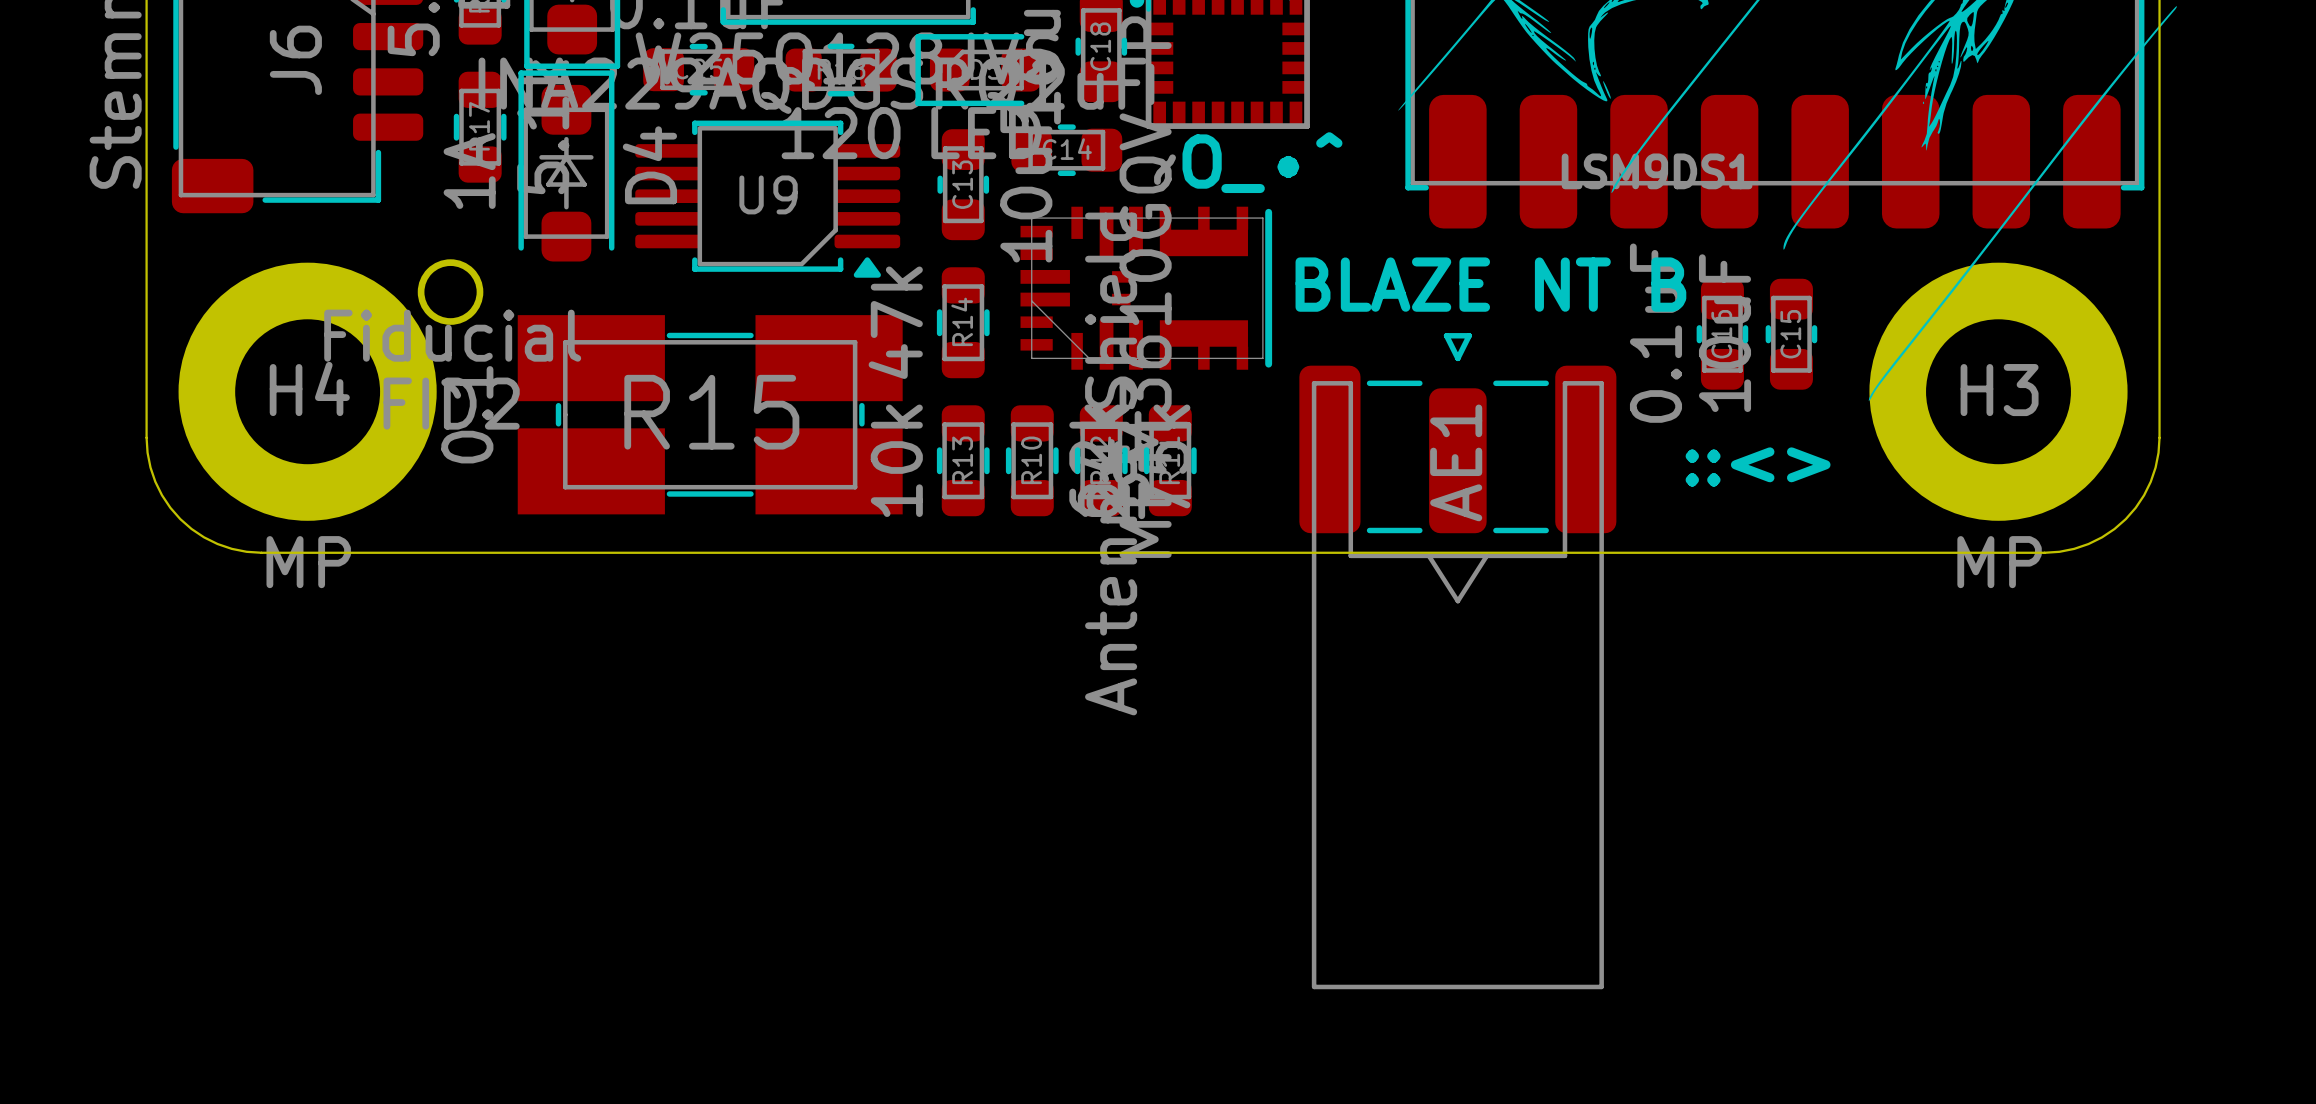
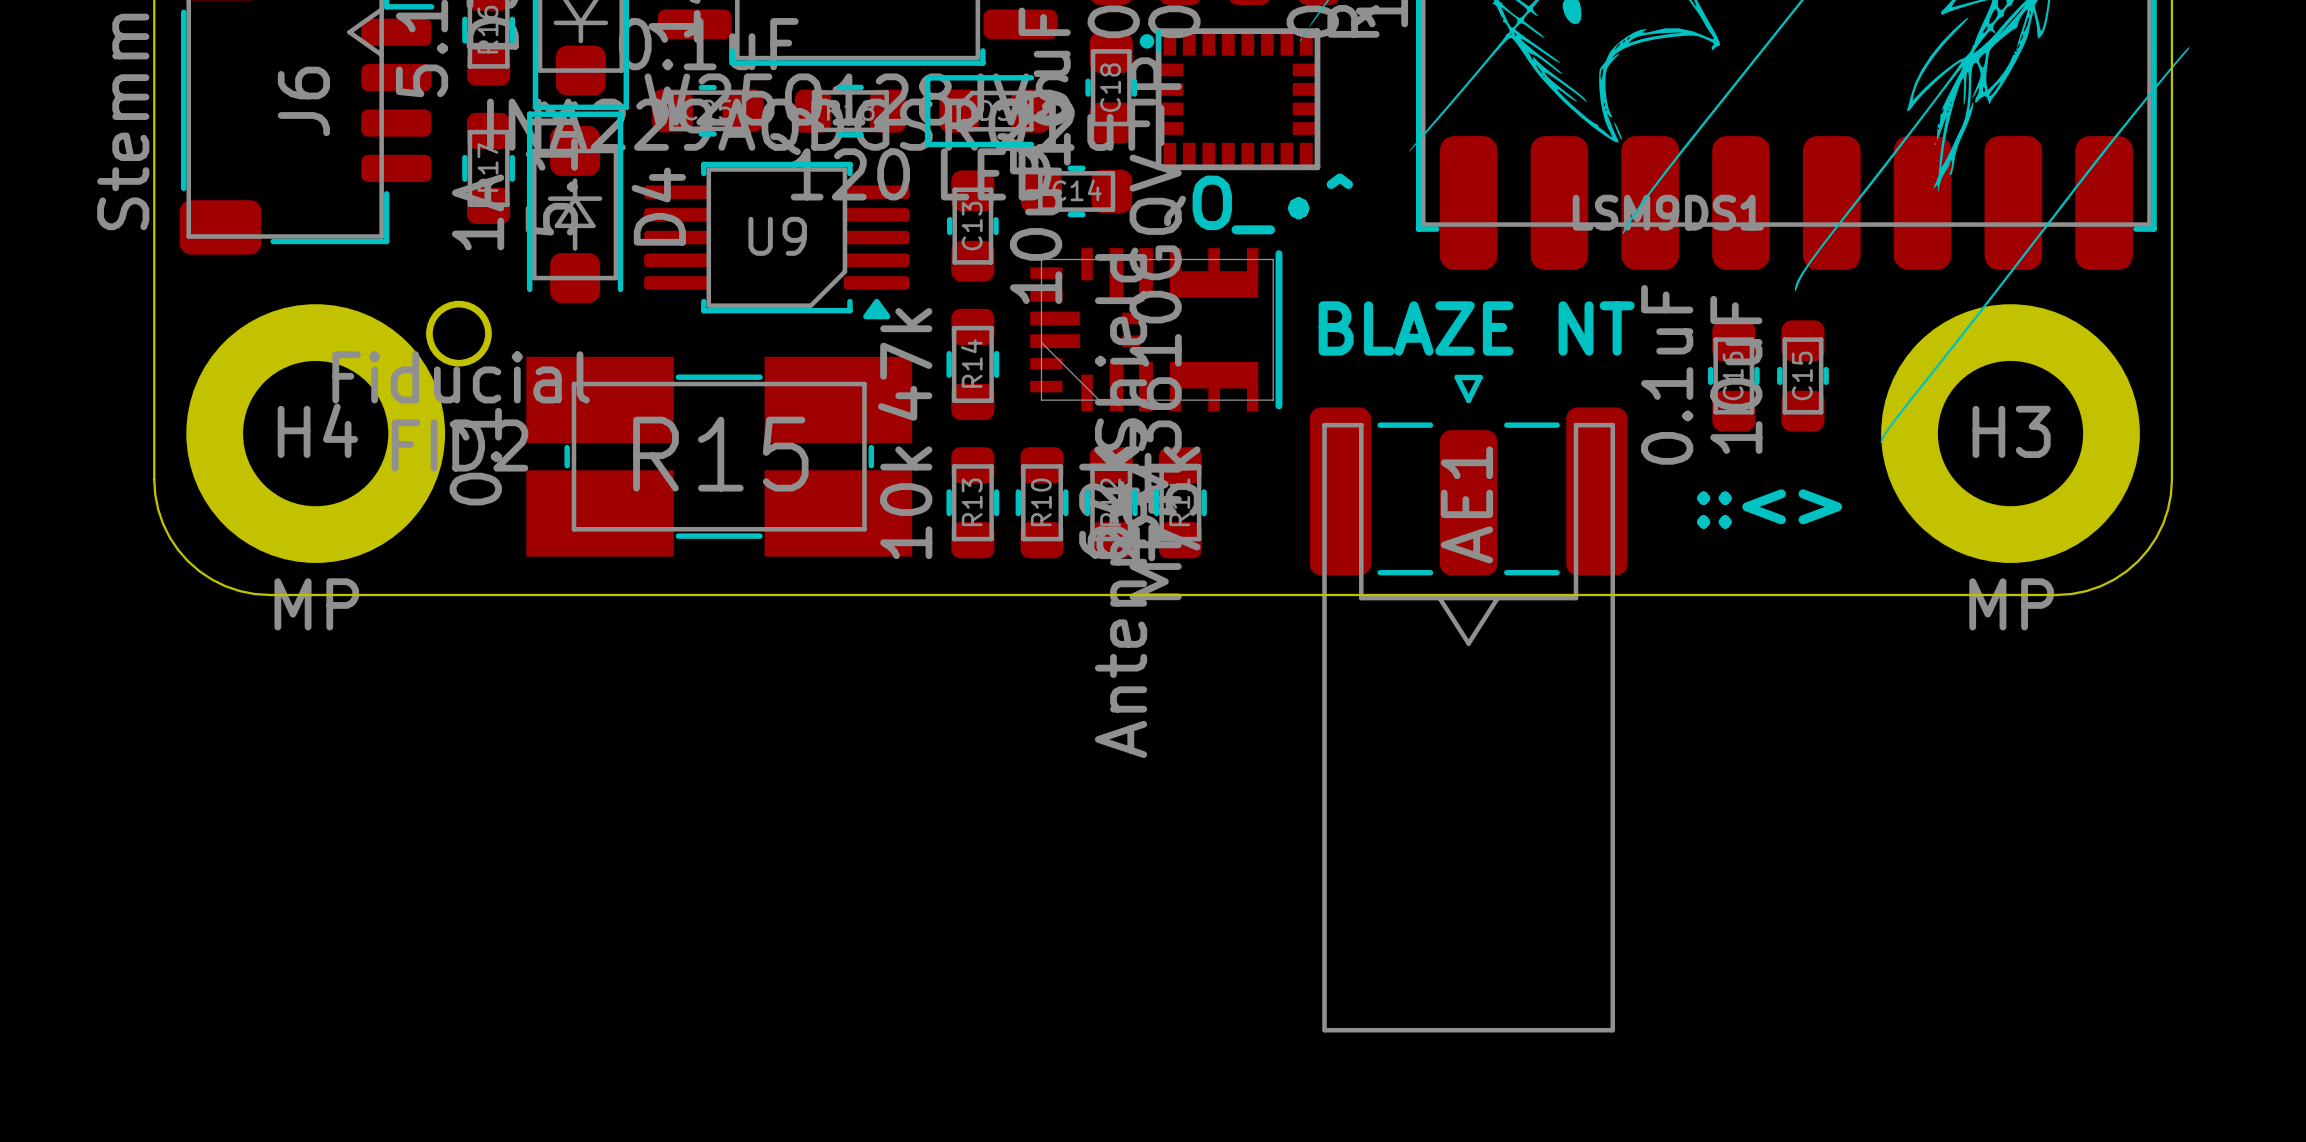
text: BLAZE NT B (1490, 284) -> BLAZE NT (1476, 328)

